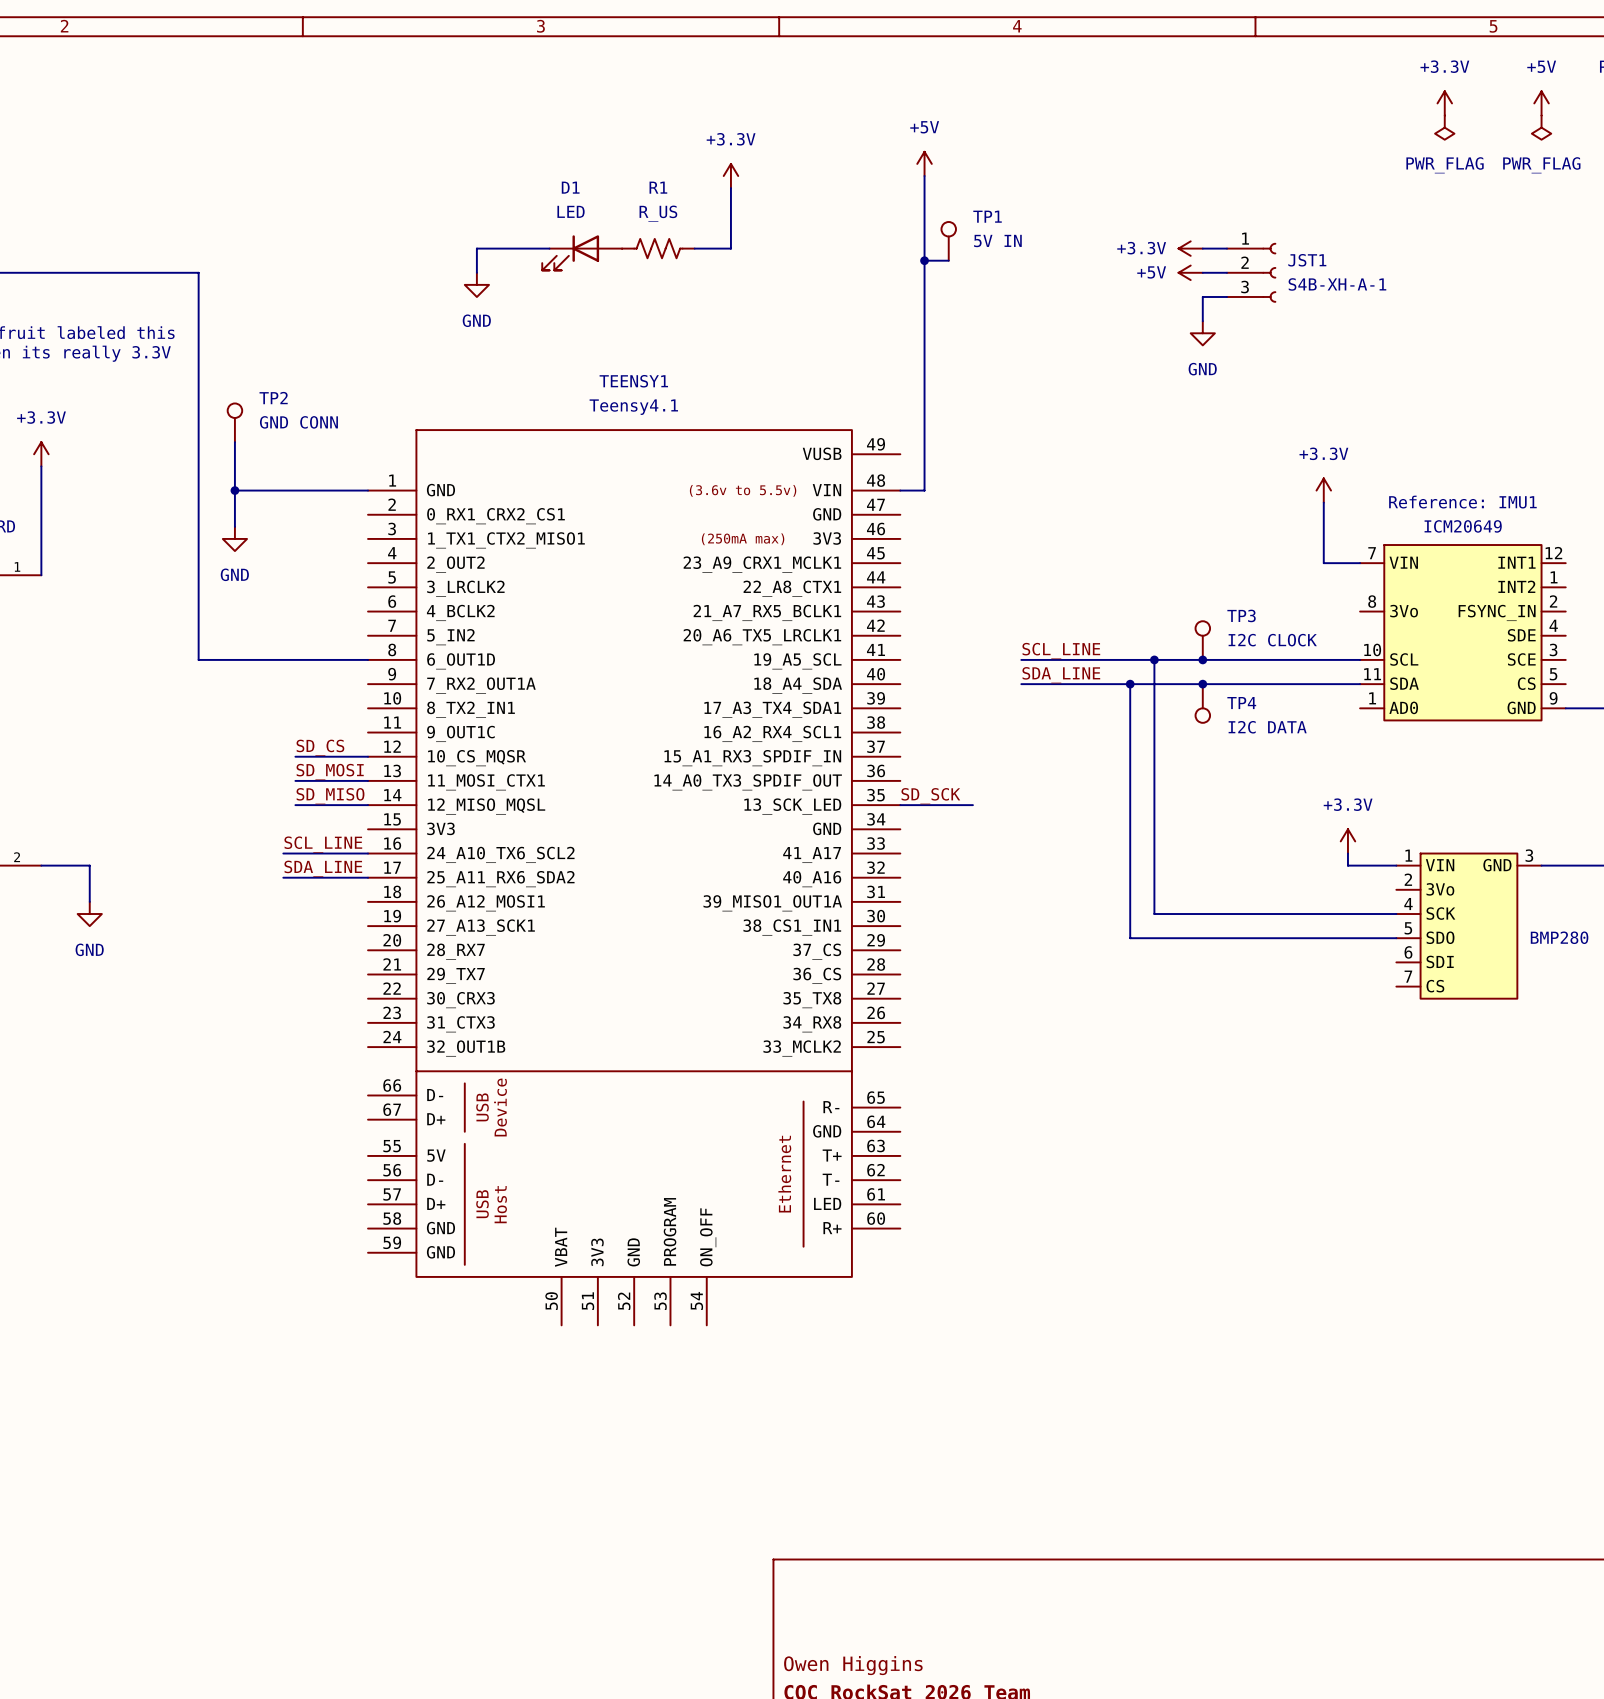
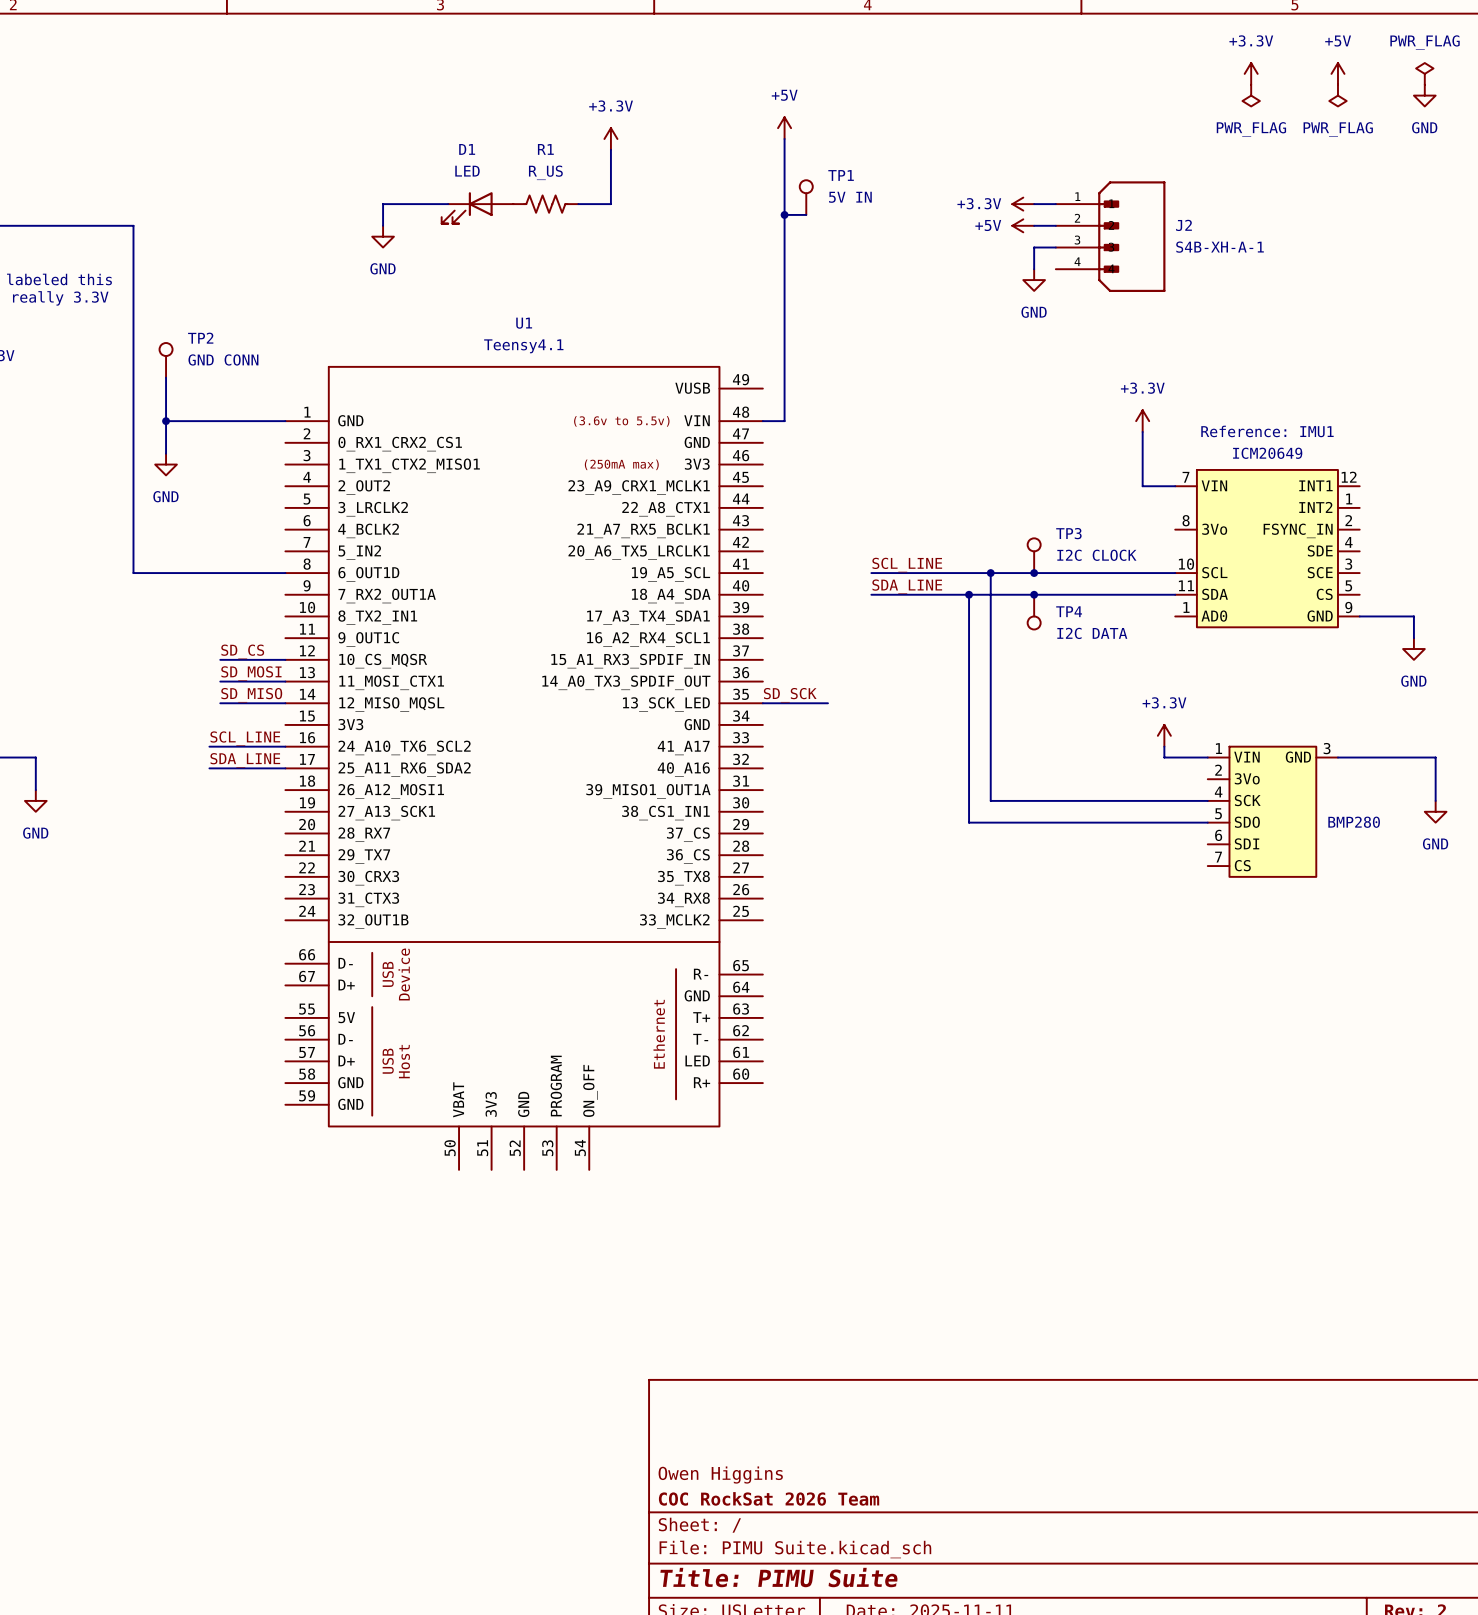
JST1: S4B-XH-A-1 (1251, 272) -> none
J2: none -> S4B-XH-A-1 (1110, 236)
TEENSY1 name: TEENSY1 (633, 381) -> U1 (524, 323)

